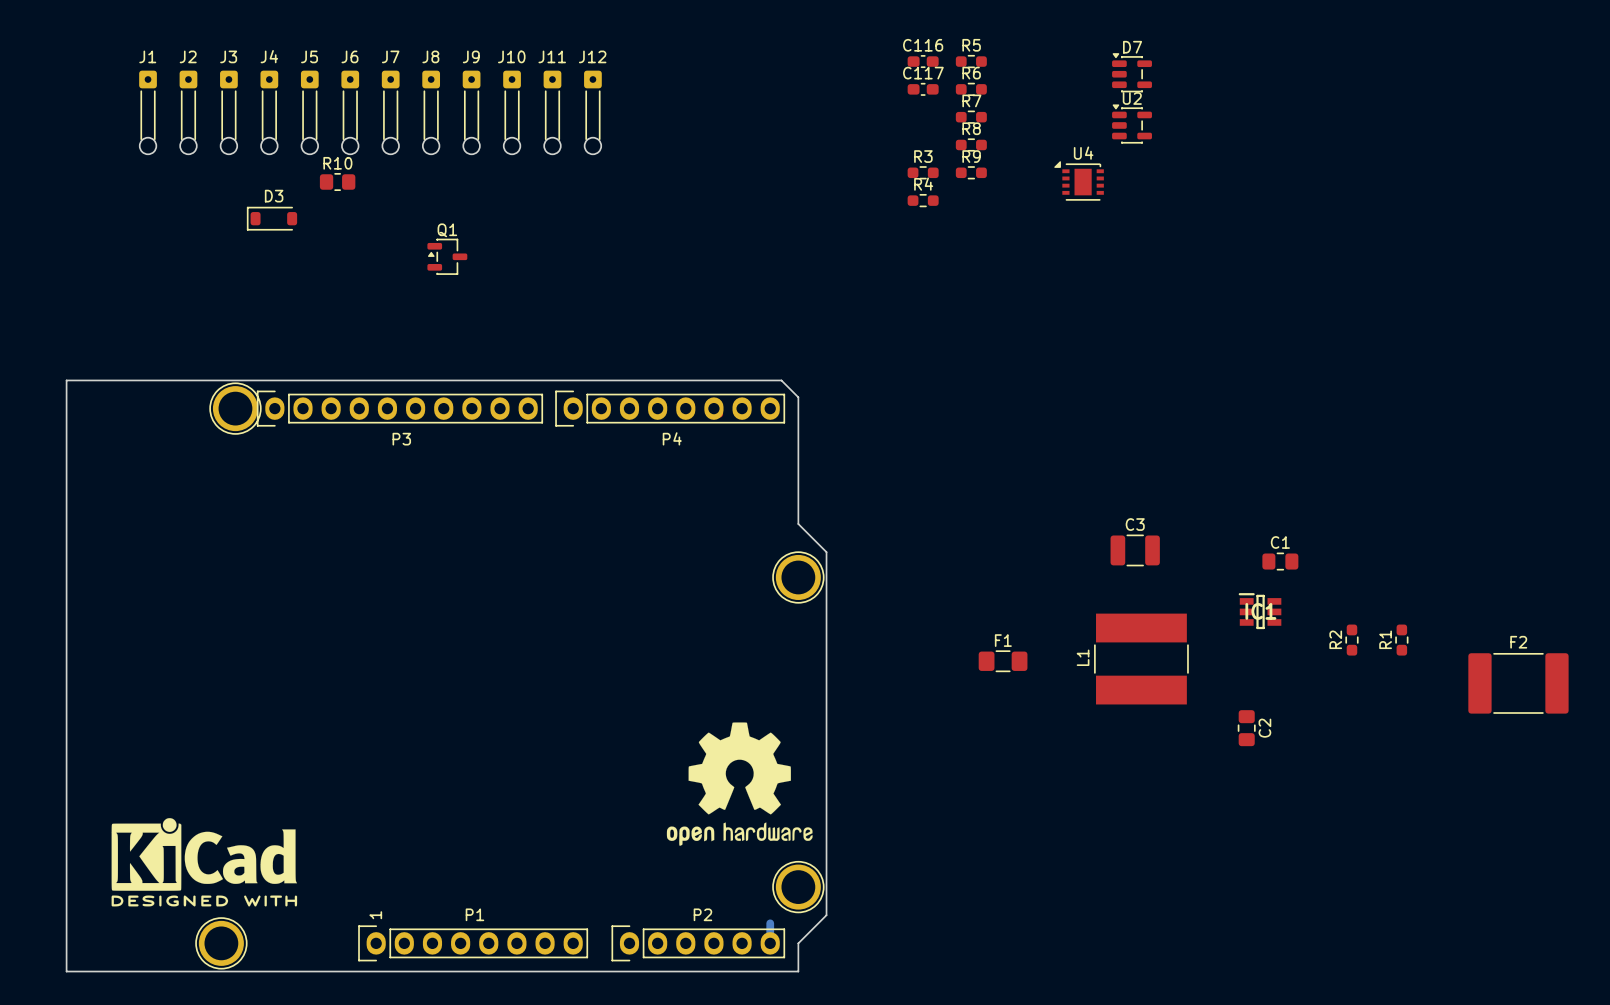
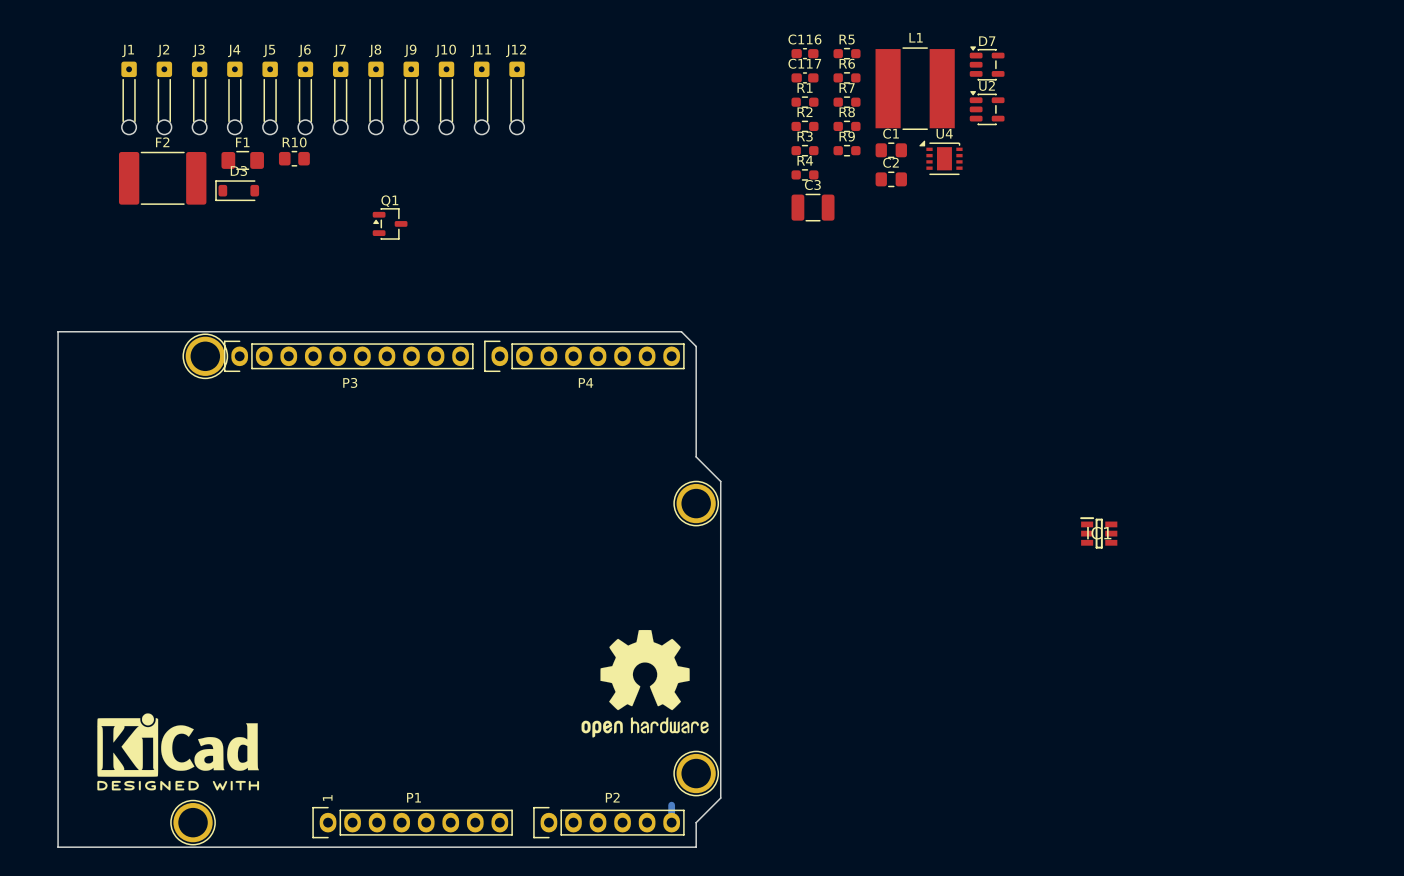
C3 position: (1135, 550) -> (813, 207)
C1 position: (1280, 561) -> (891, 150)
R2 rotation: 0° (1351, 640) -> 90° clockwise (804, 126)
R2 position: (1351, 640) -> (804, 126)
R1 rotation: 0° (1401, 640) -> 90° clockwise (804, 102)
R1 position: (1401, 640) -> (804, 102)
L1 rotation: 0° (1141, 659) -> 90° clockwise (915, 88)
L1 position: (1141, 659) -> (915, 88)
F1 position: (1003, 661) -> (242, 160)
F2 position: (1518, 683) -> (162, 178)
C2 rotation: 0° (1246, 728) -> 90° clockwise (891, 179)
C2 position: (1246, 728) -> (891, 179)
C2 name position: C2 (1264, 728) -> C2 (890, 162)

